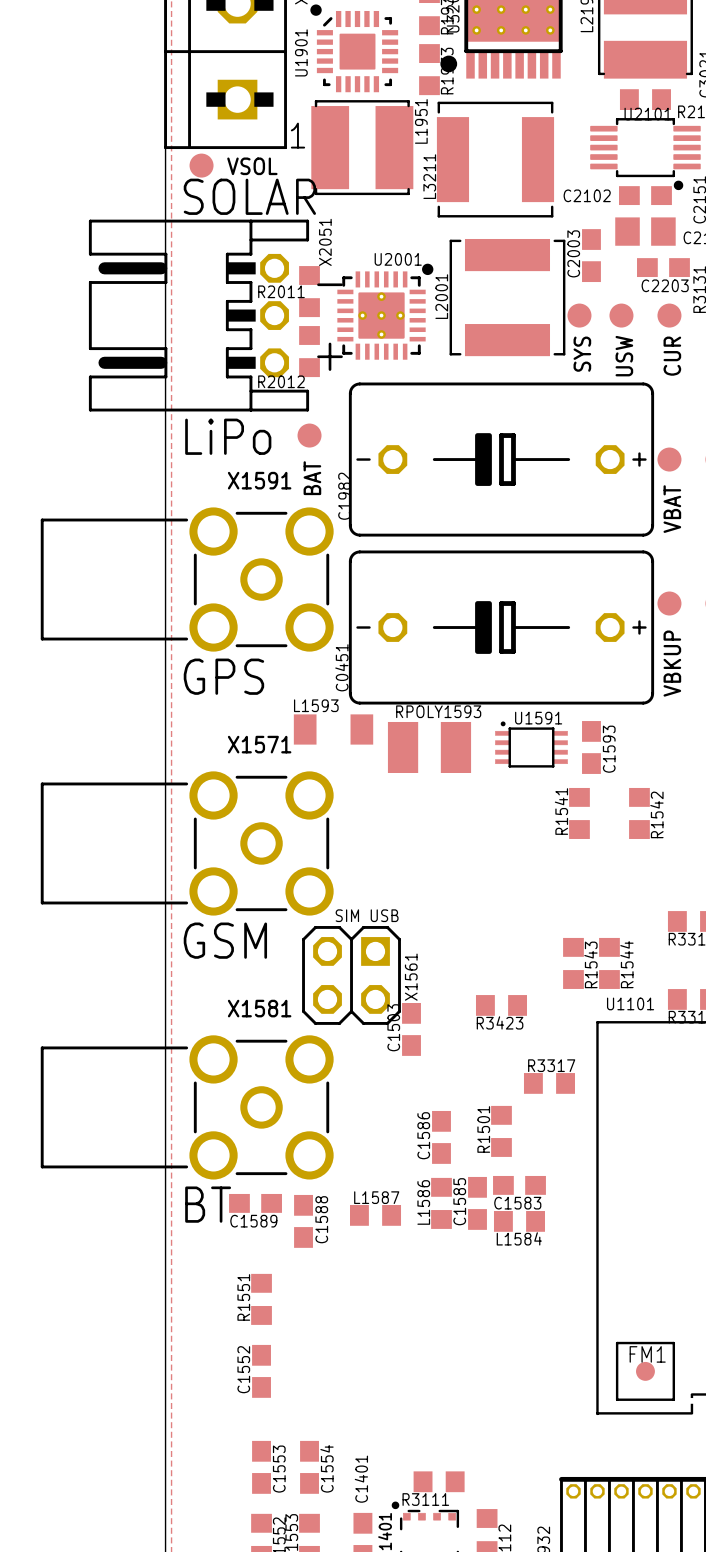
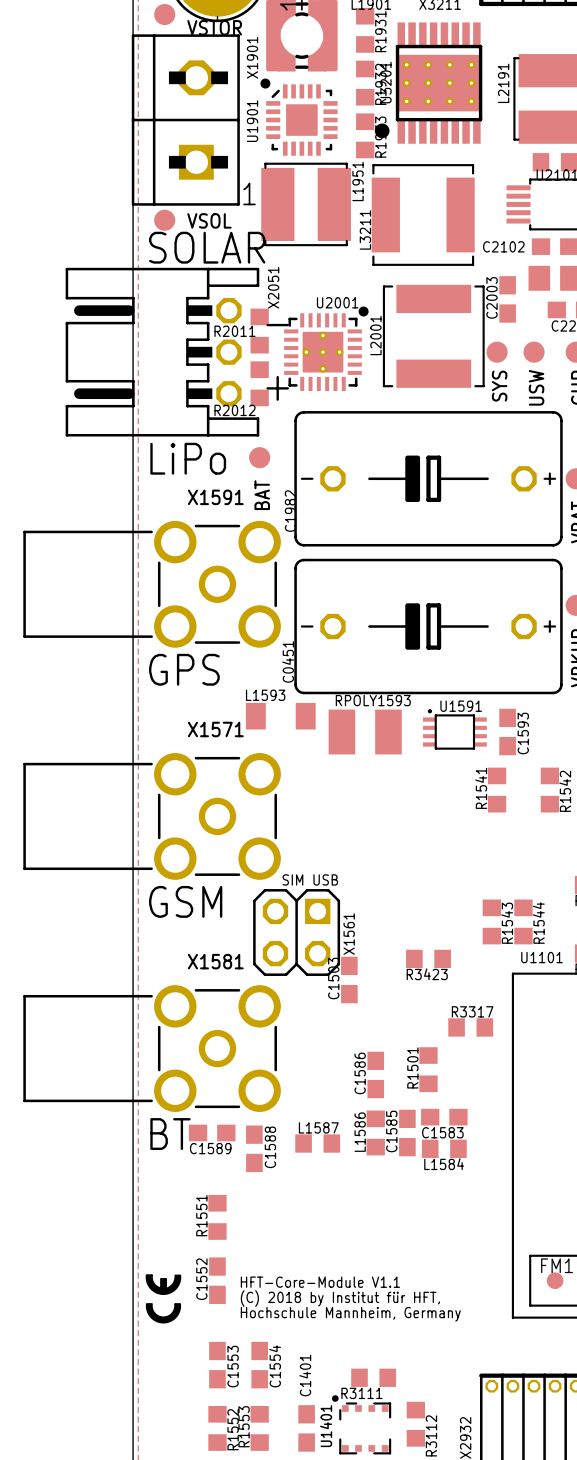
drawing: none -> [145, 1274, 182, 1324]
text: none -> HFT-Core-Module V1.1 (320, 1282)
text: none -> (C) 2018 by Institut für HFT, (340, 1298)
text: none -> Hochschule Mannheim, Germany (350, 1314)

